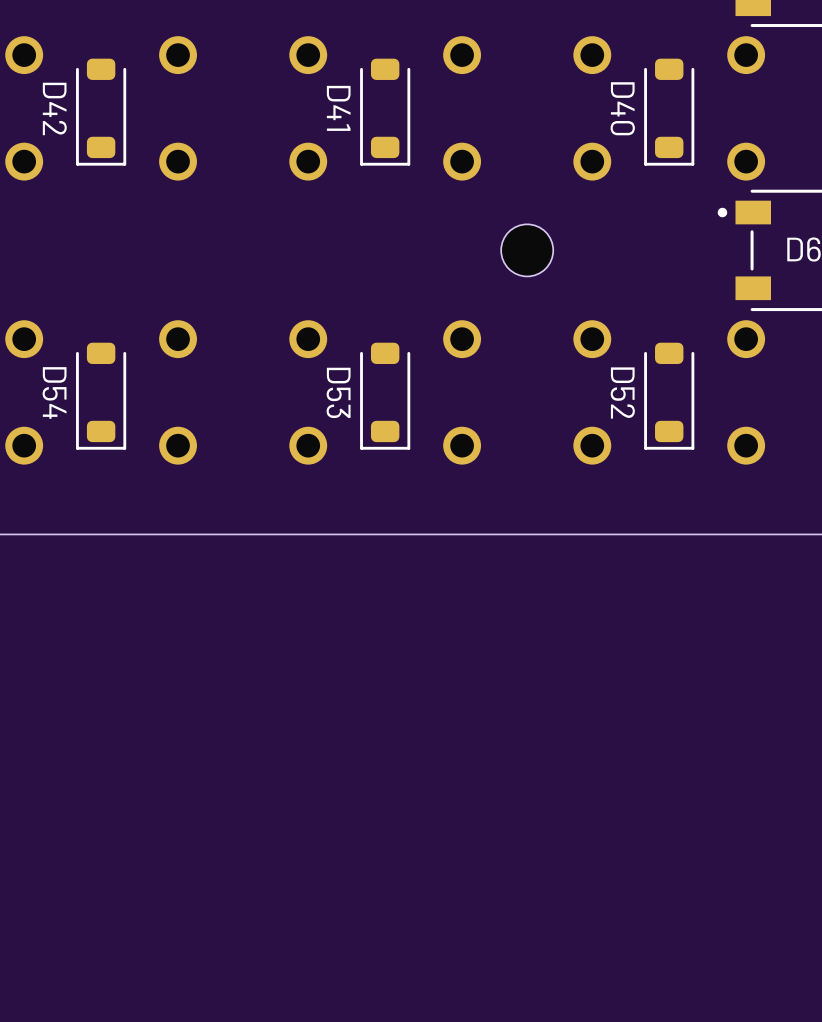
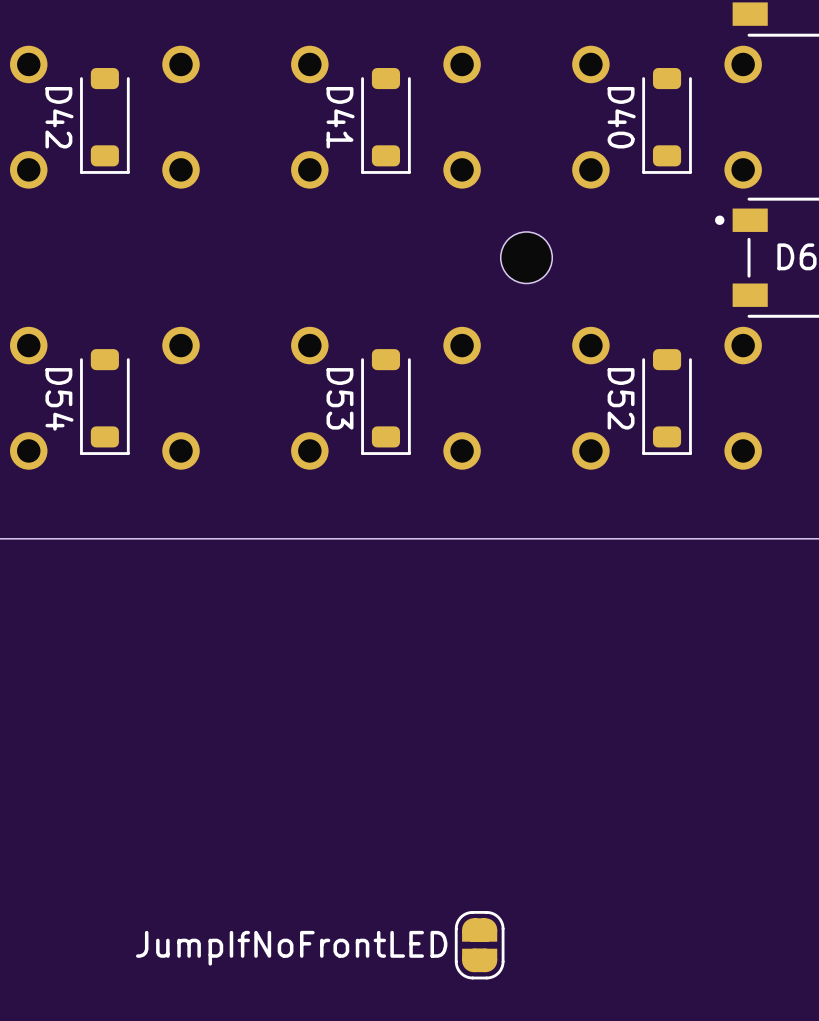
JumpIfNoFrontLED: none -> (479, 945)

